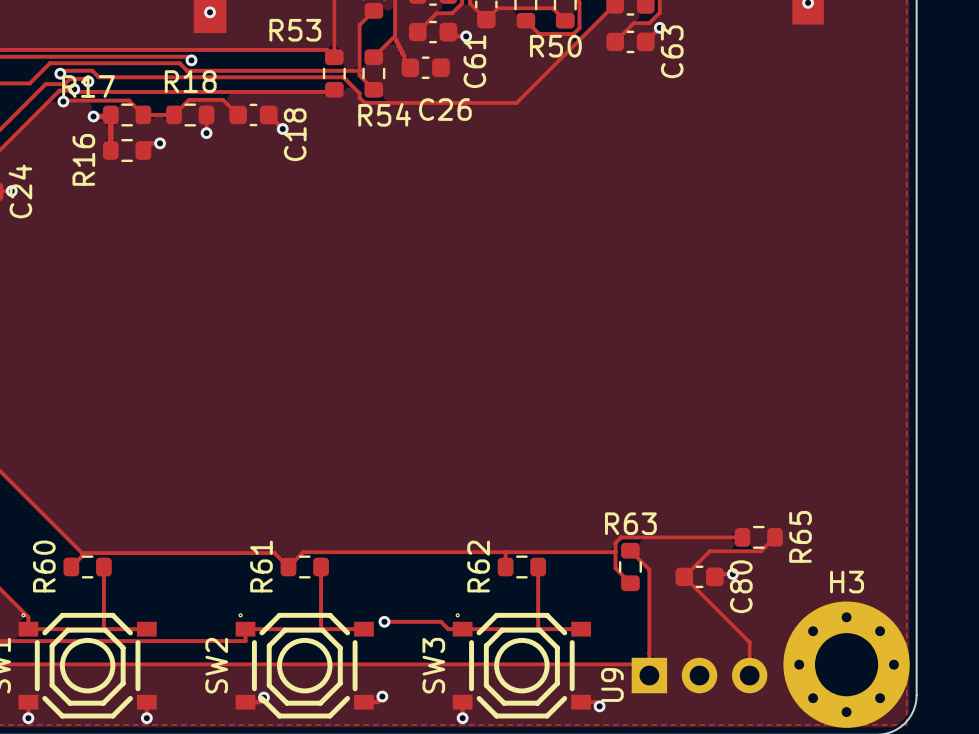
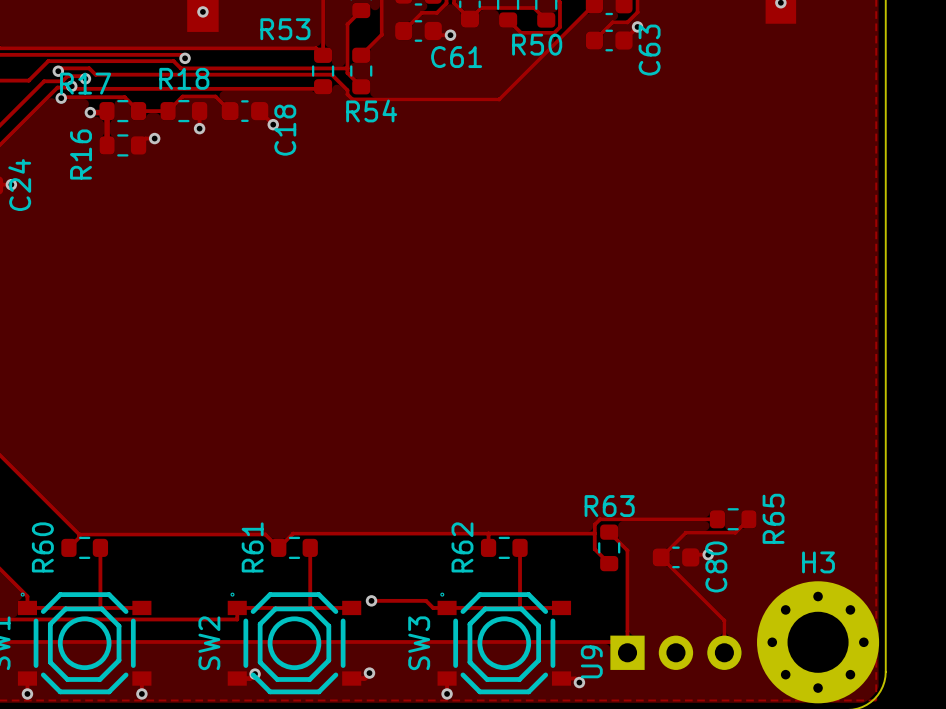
track: (395, 35) (404, 59) (410, 67) -> none
C61 name rotation: 0° (474, 61) -> 90° clockwise (456, 57)
C26: (425, 67) -> none

